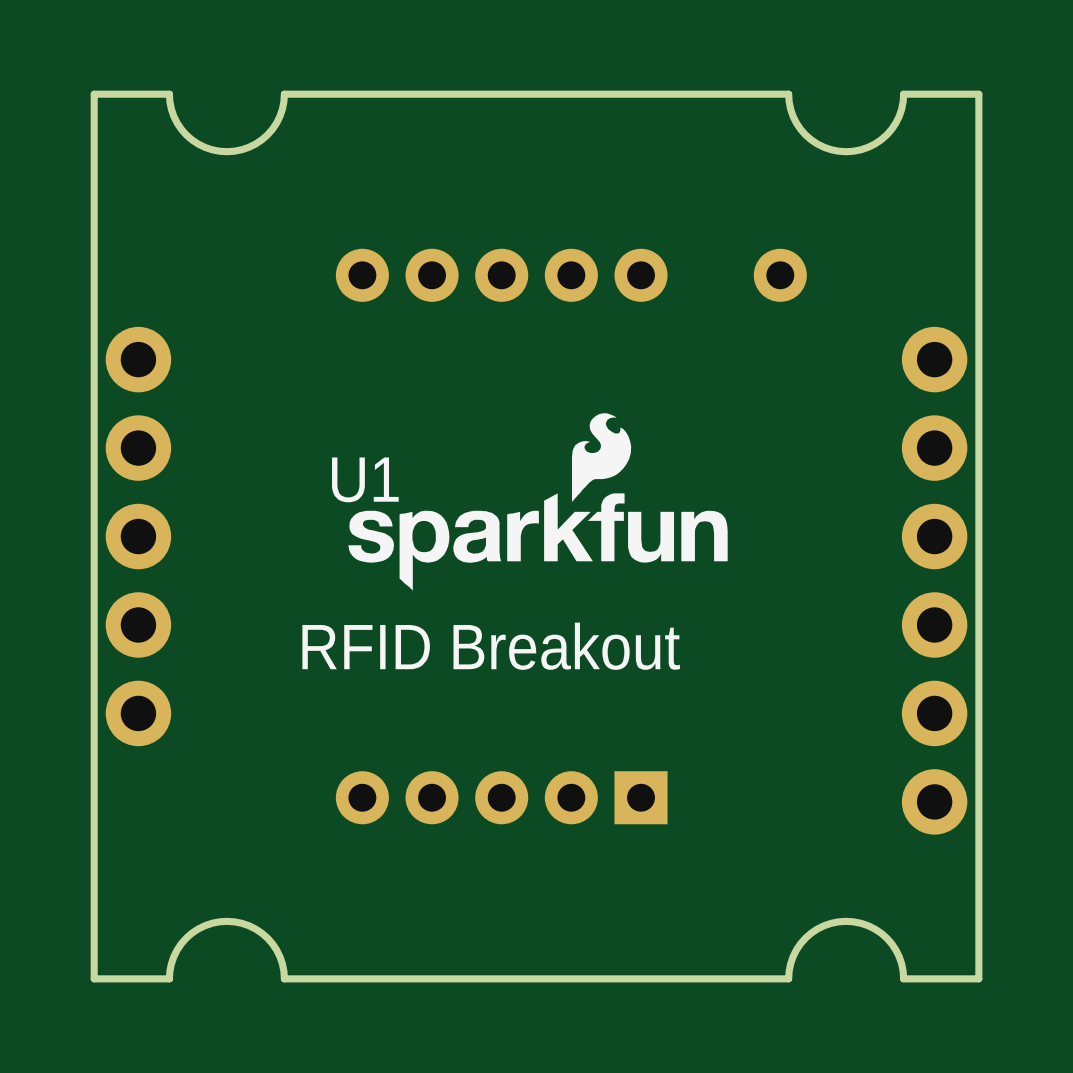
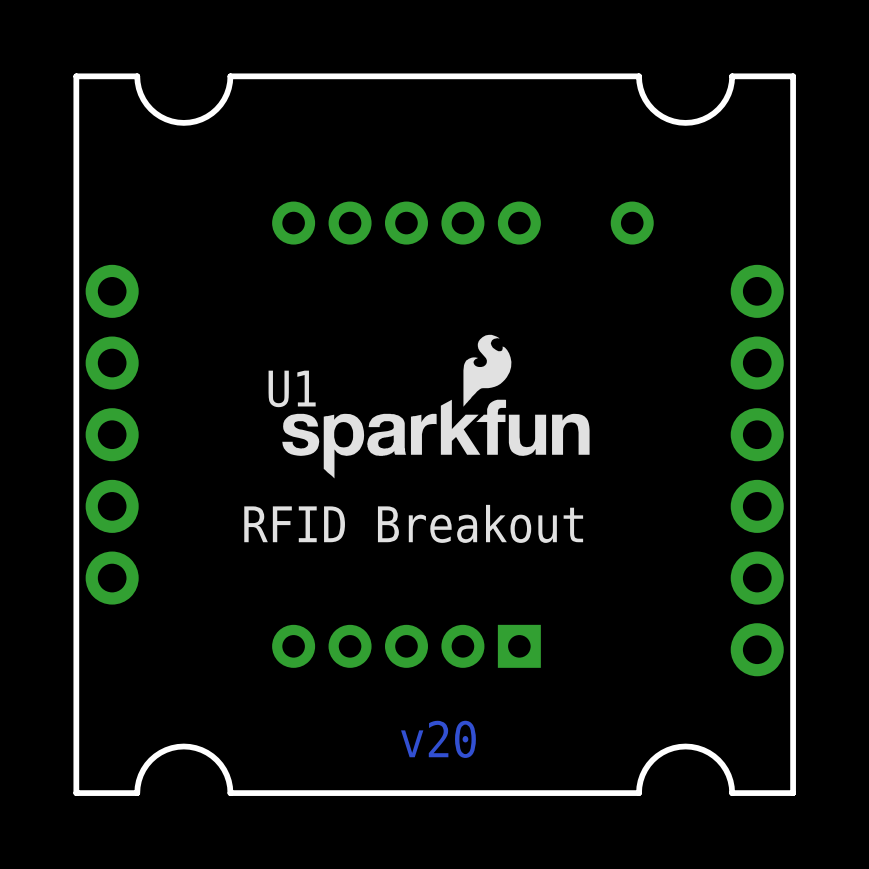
text: none -> v20 (438, 739)

